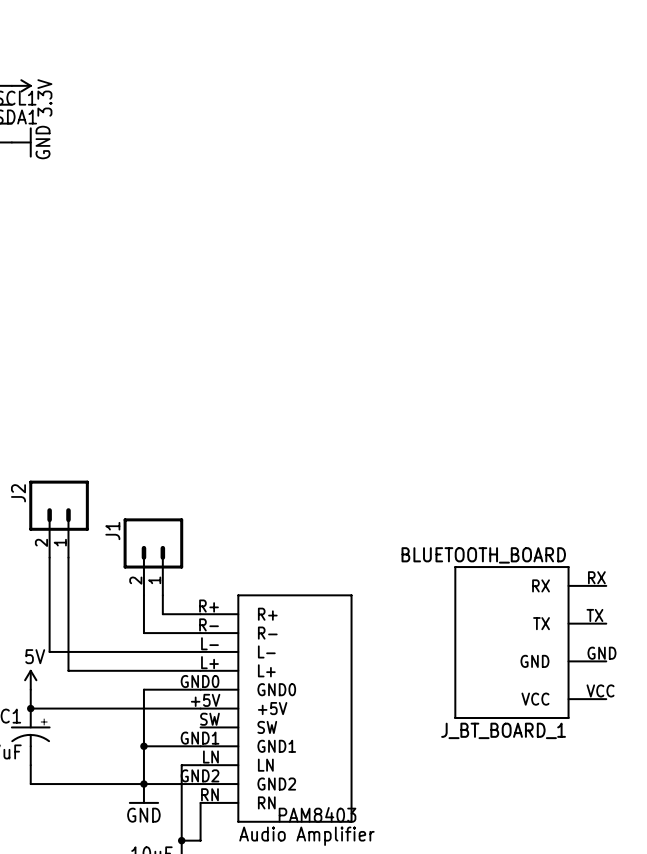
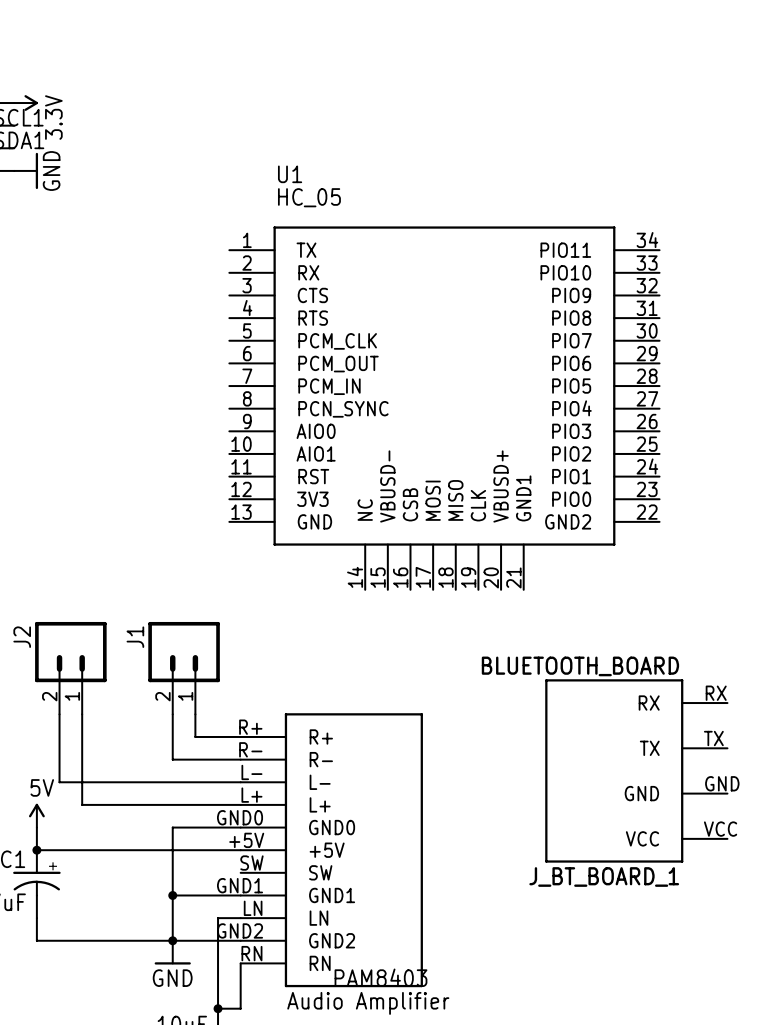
U1: none -> HC_05 (444, 408)
J2 position: (59, 519) -> (70, 668)

